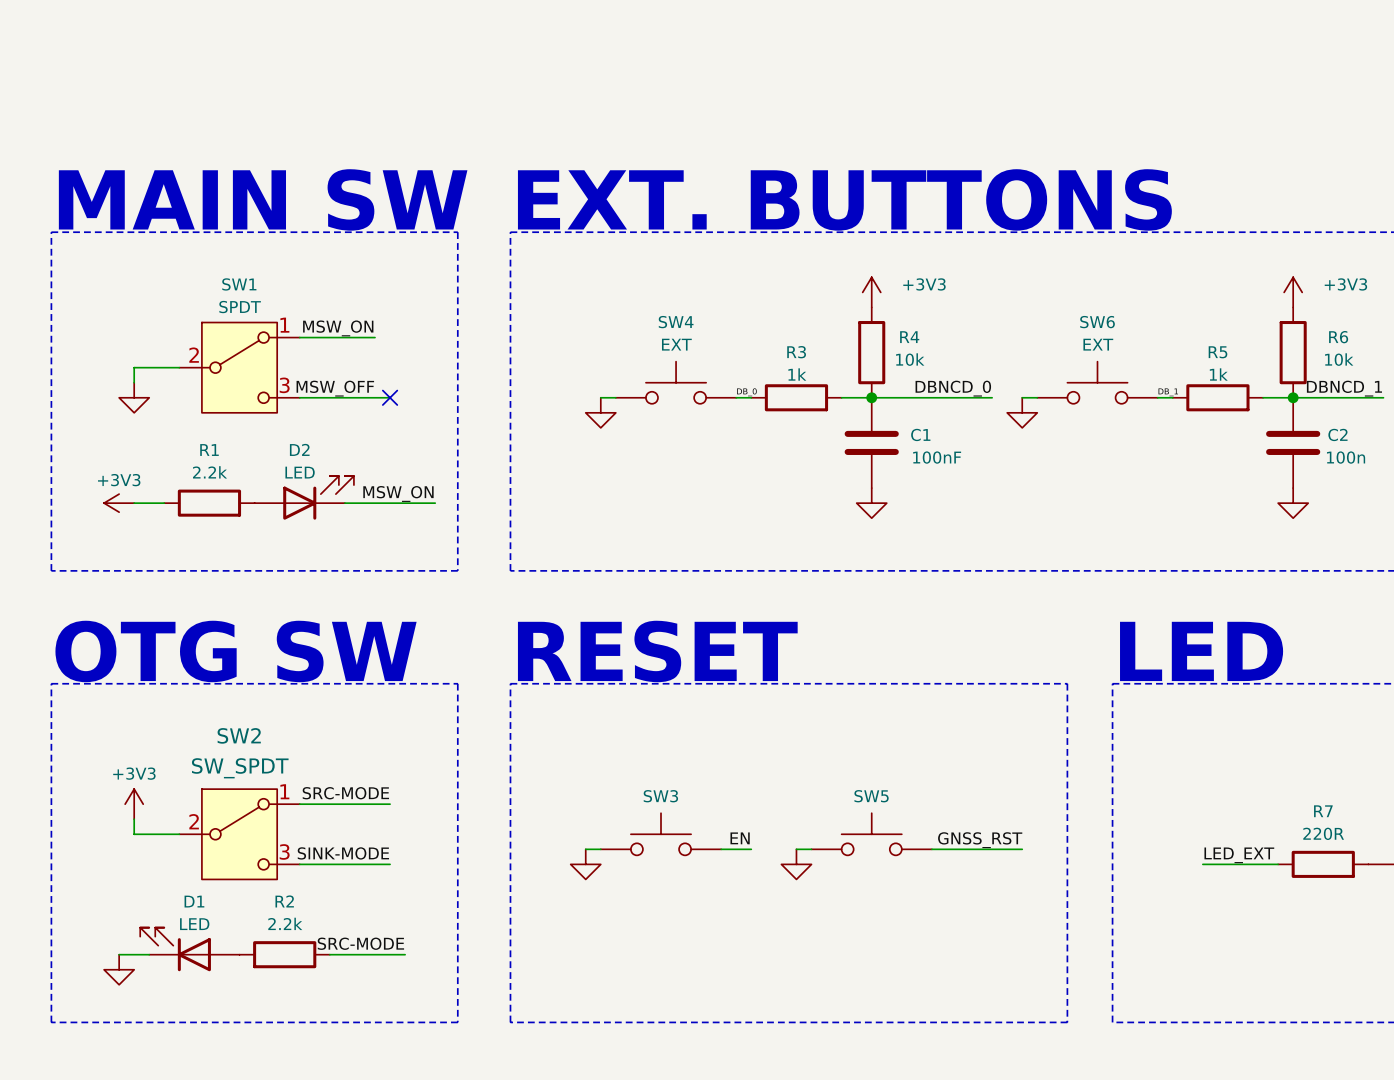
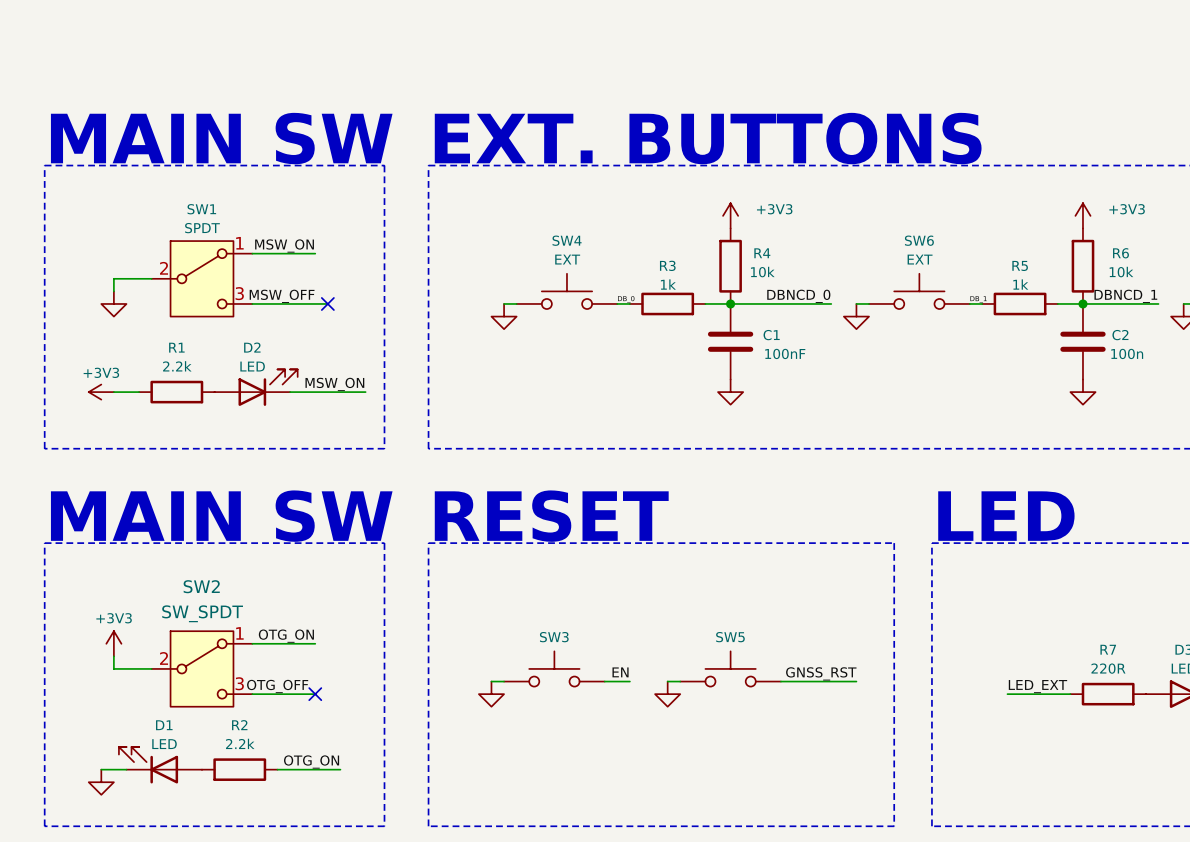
text: OTG SW (236, 651) -> MAIN SW (221, 516)
label: SRC-MODE (345, 793) -> none
label: none -> OTG_ON (286, 636)
wire: (375, 804) (390, 804) -> none
label: SINK-MODE (343, 853) -> none
label: none -> OTG_OFF (277, 686)
wire: (375, 864) (390, 864) -> none
no-connect mark: none -> (315, 694)
label: SRC-MODE (360, 943) -> OTG_ON (311, 761)

